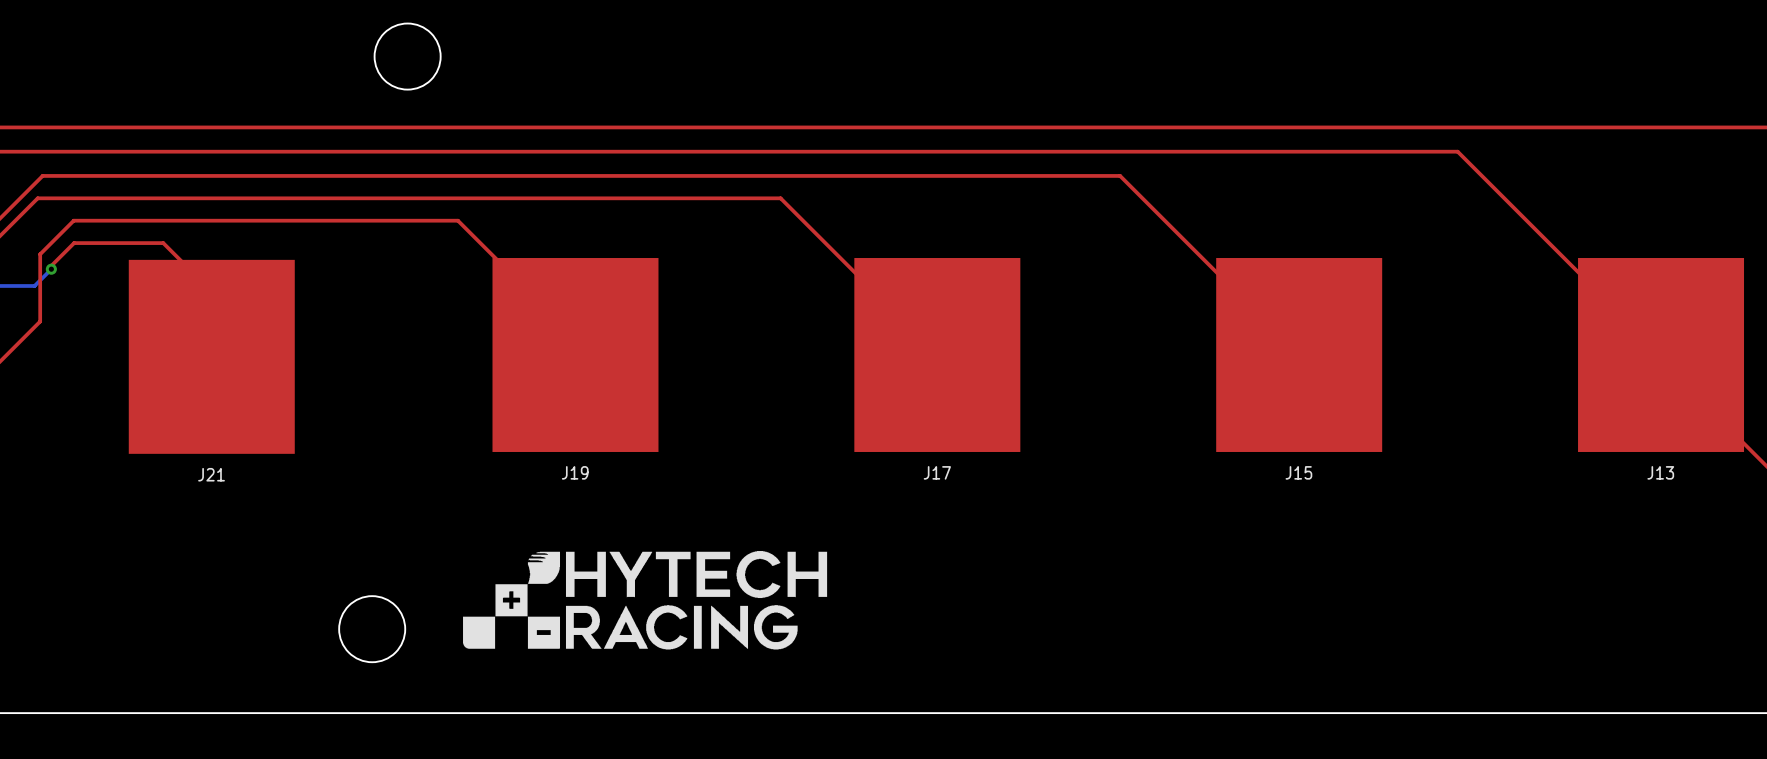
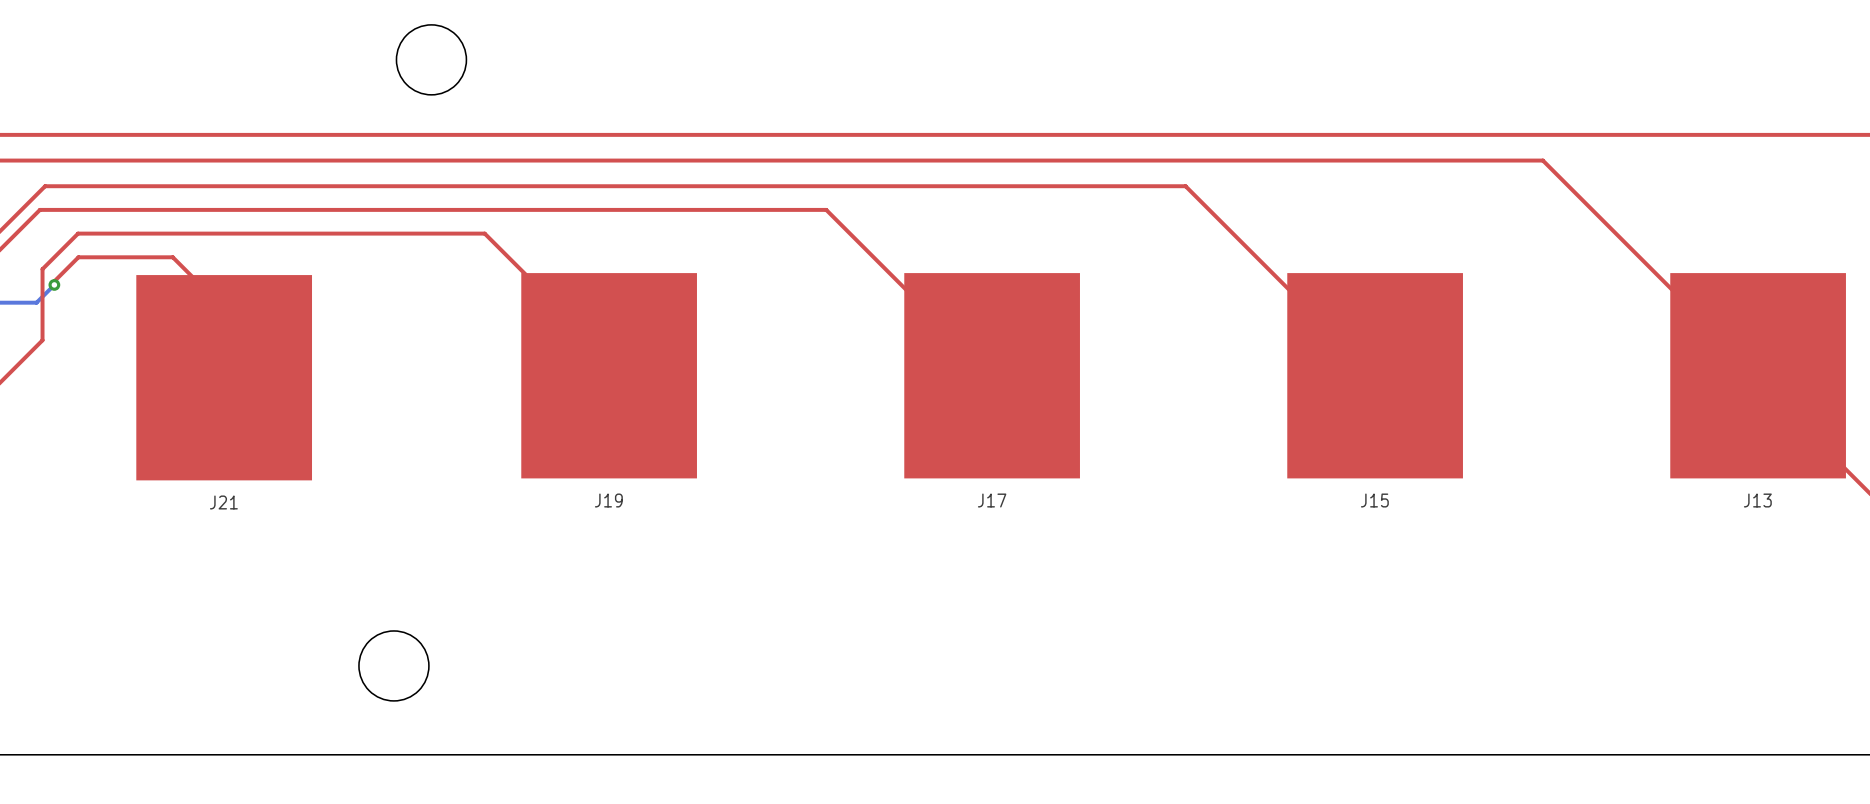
drawing: [463, 551, 828, 650] -> none

